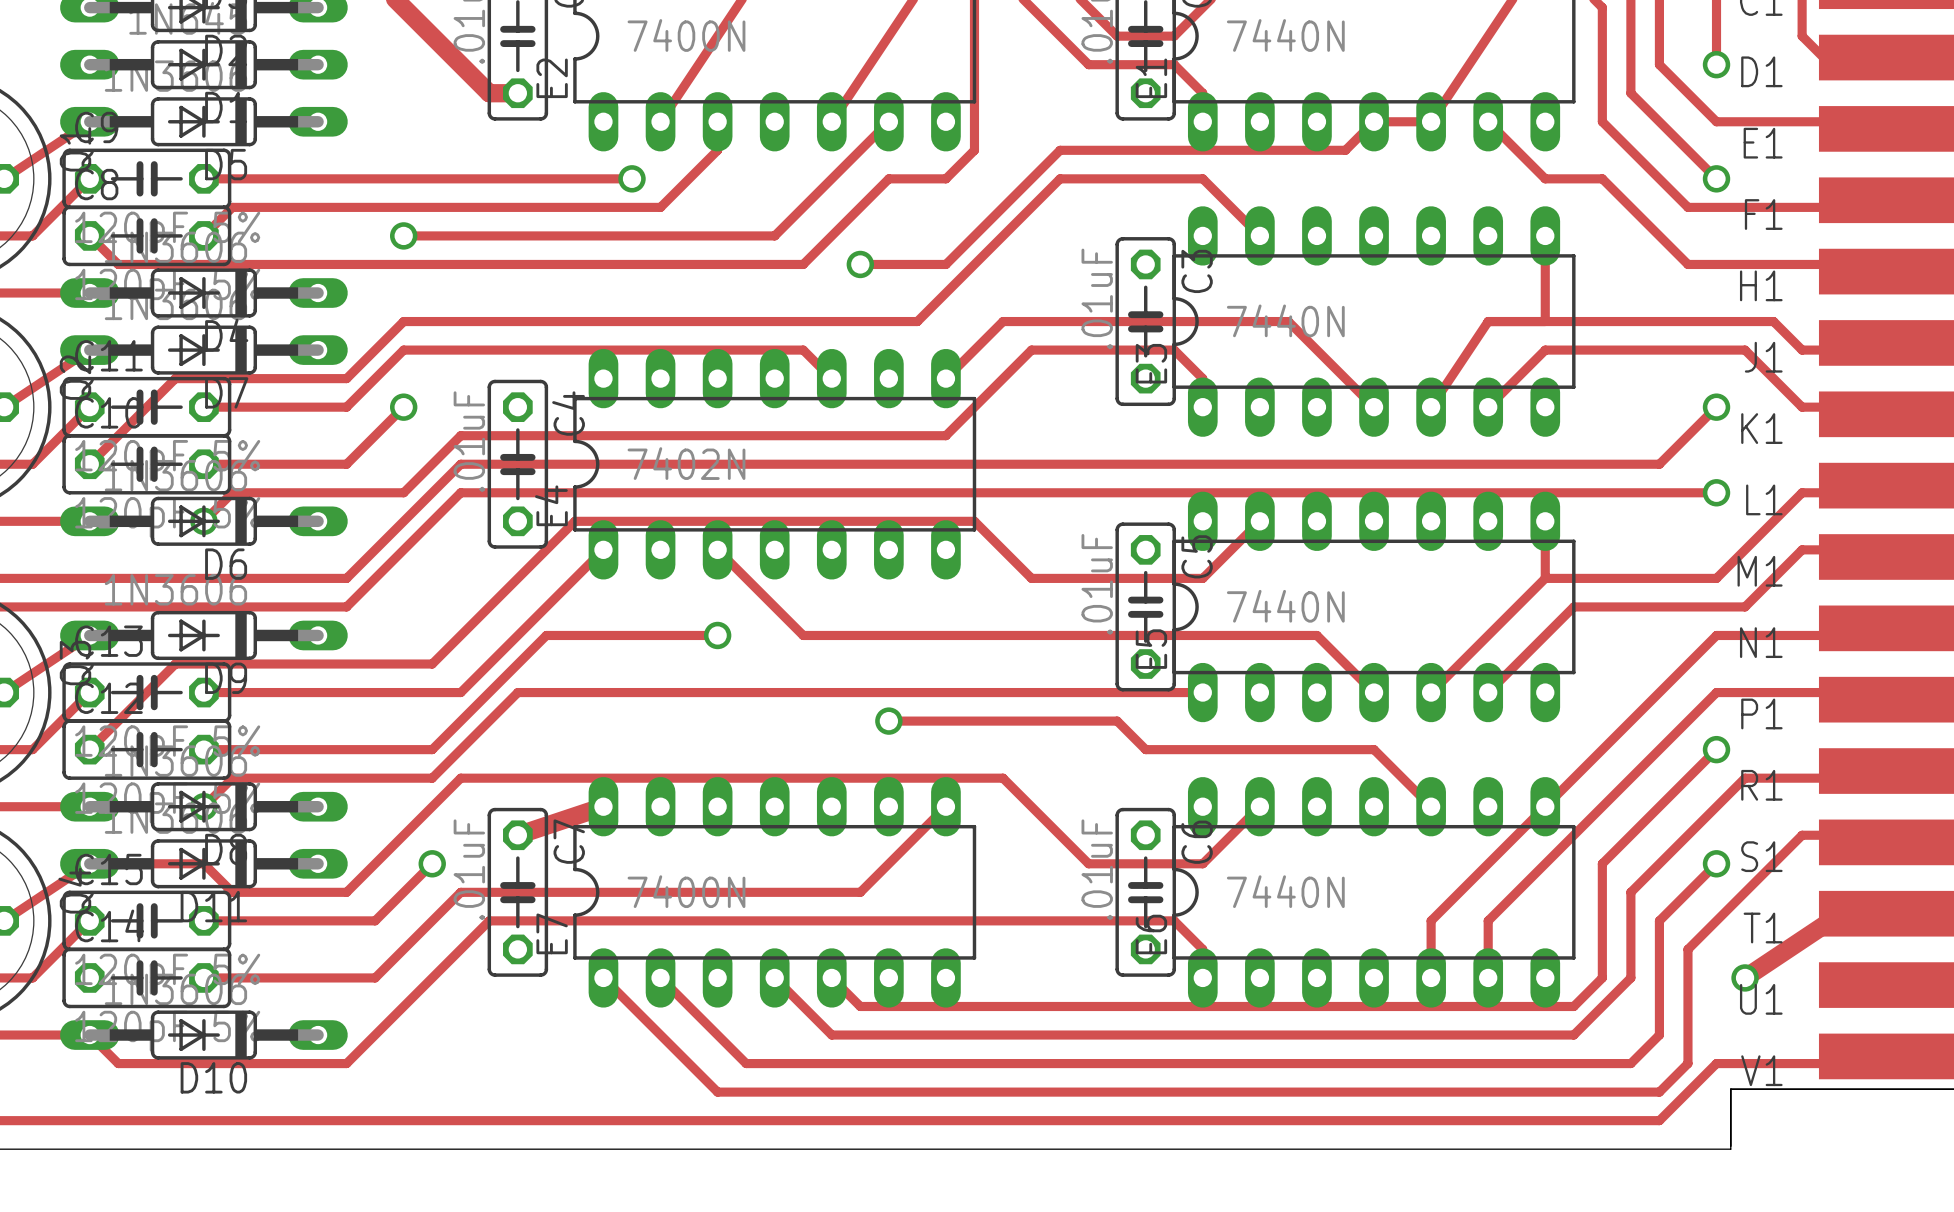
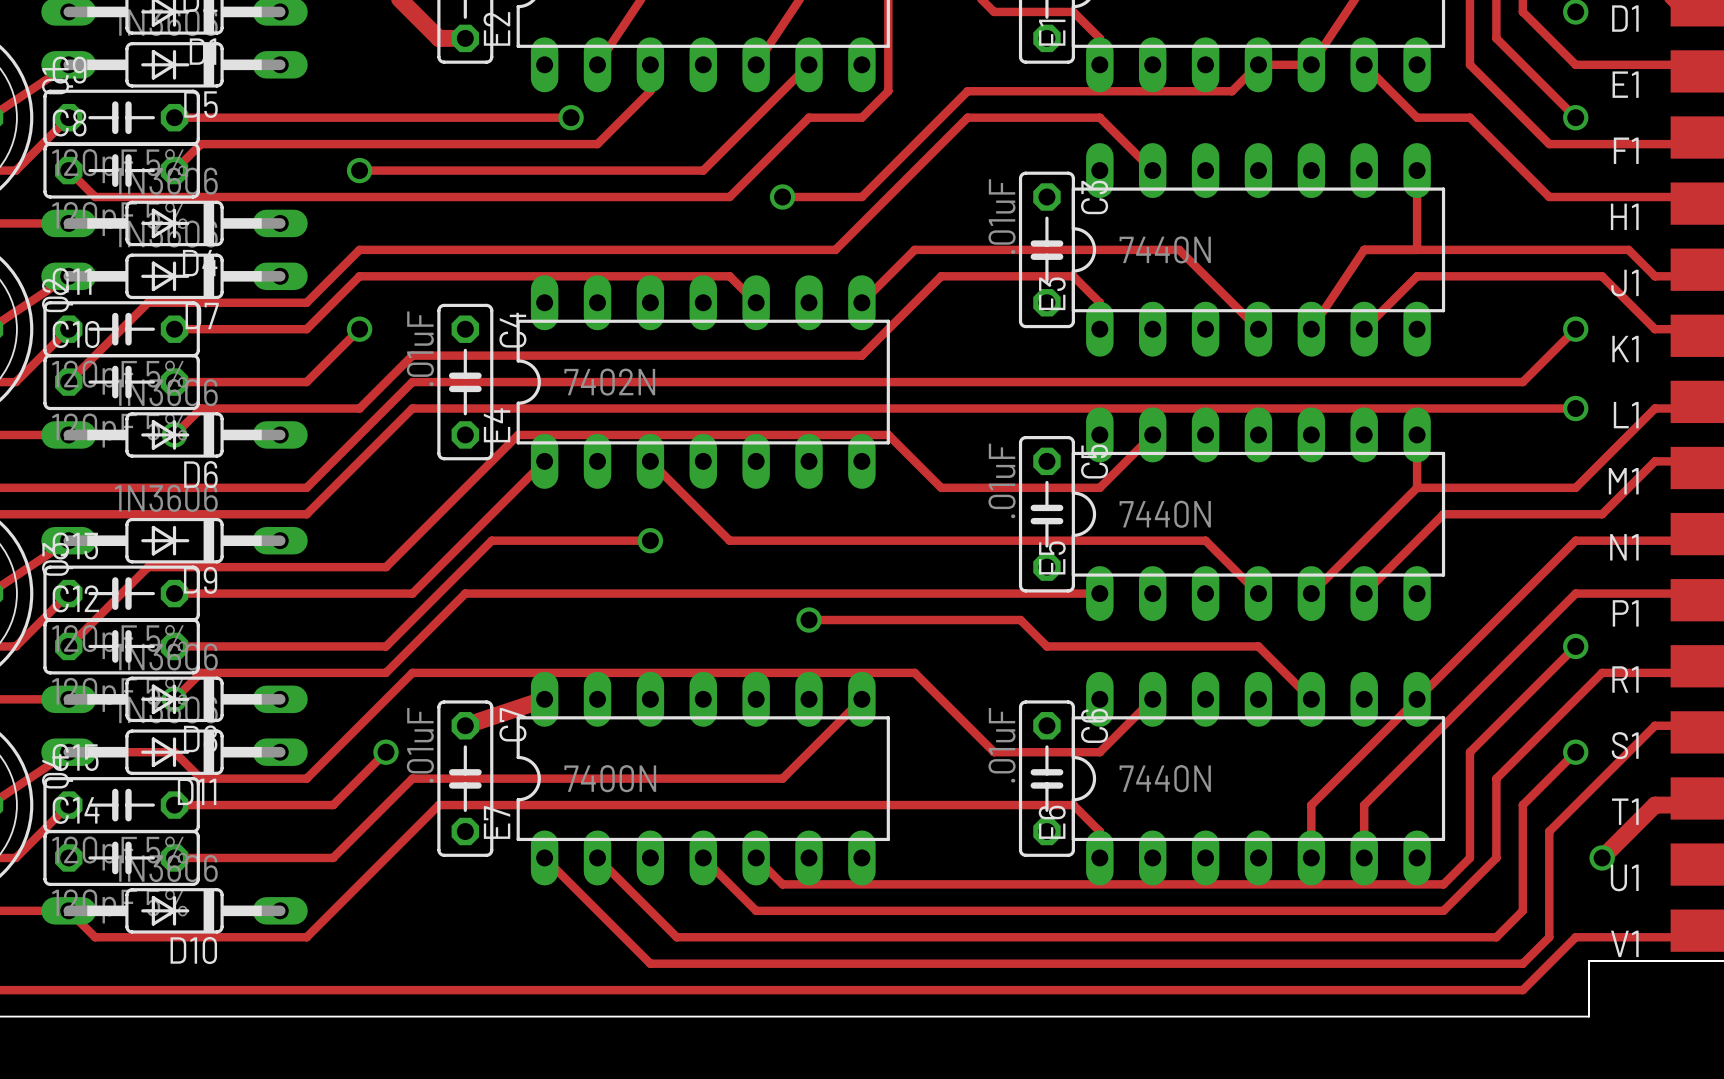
track: (1830, 920) (1745, 977) -> (1681, 805) (1655, 805) (1602, 857)

